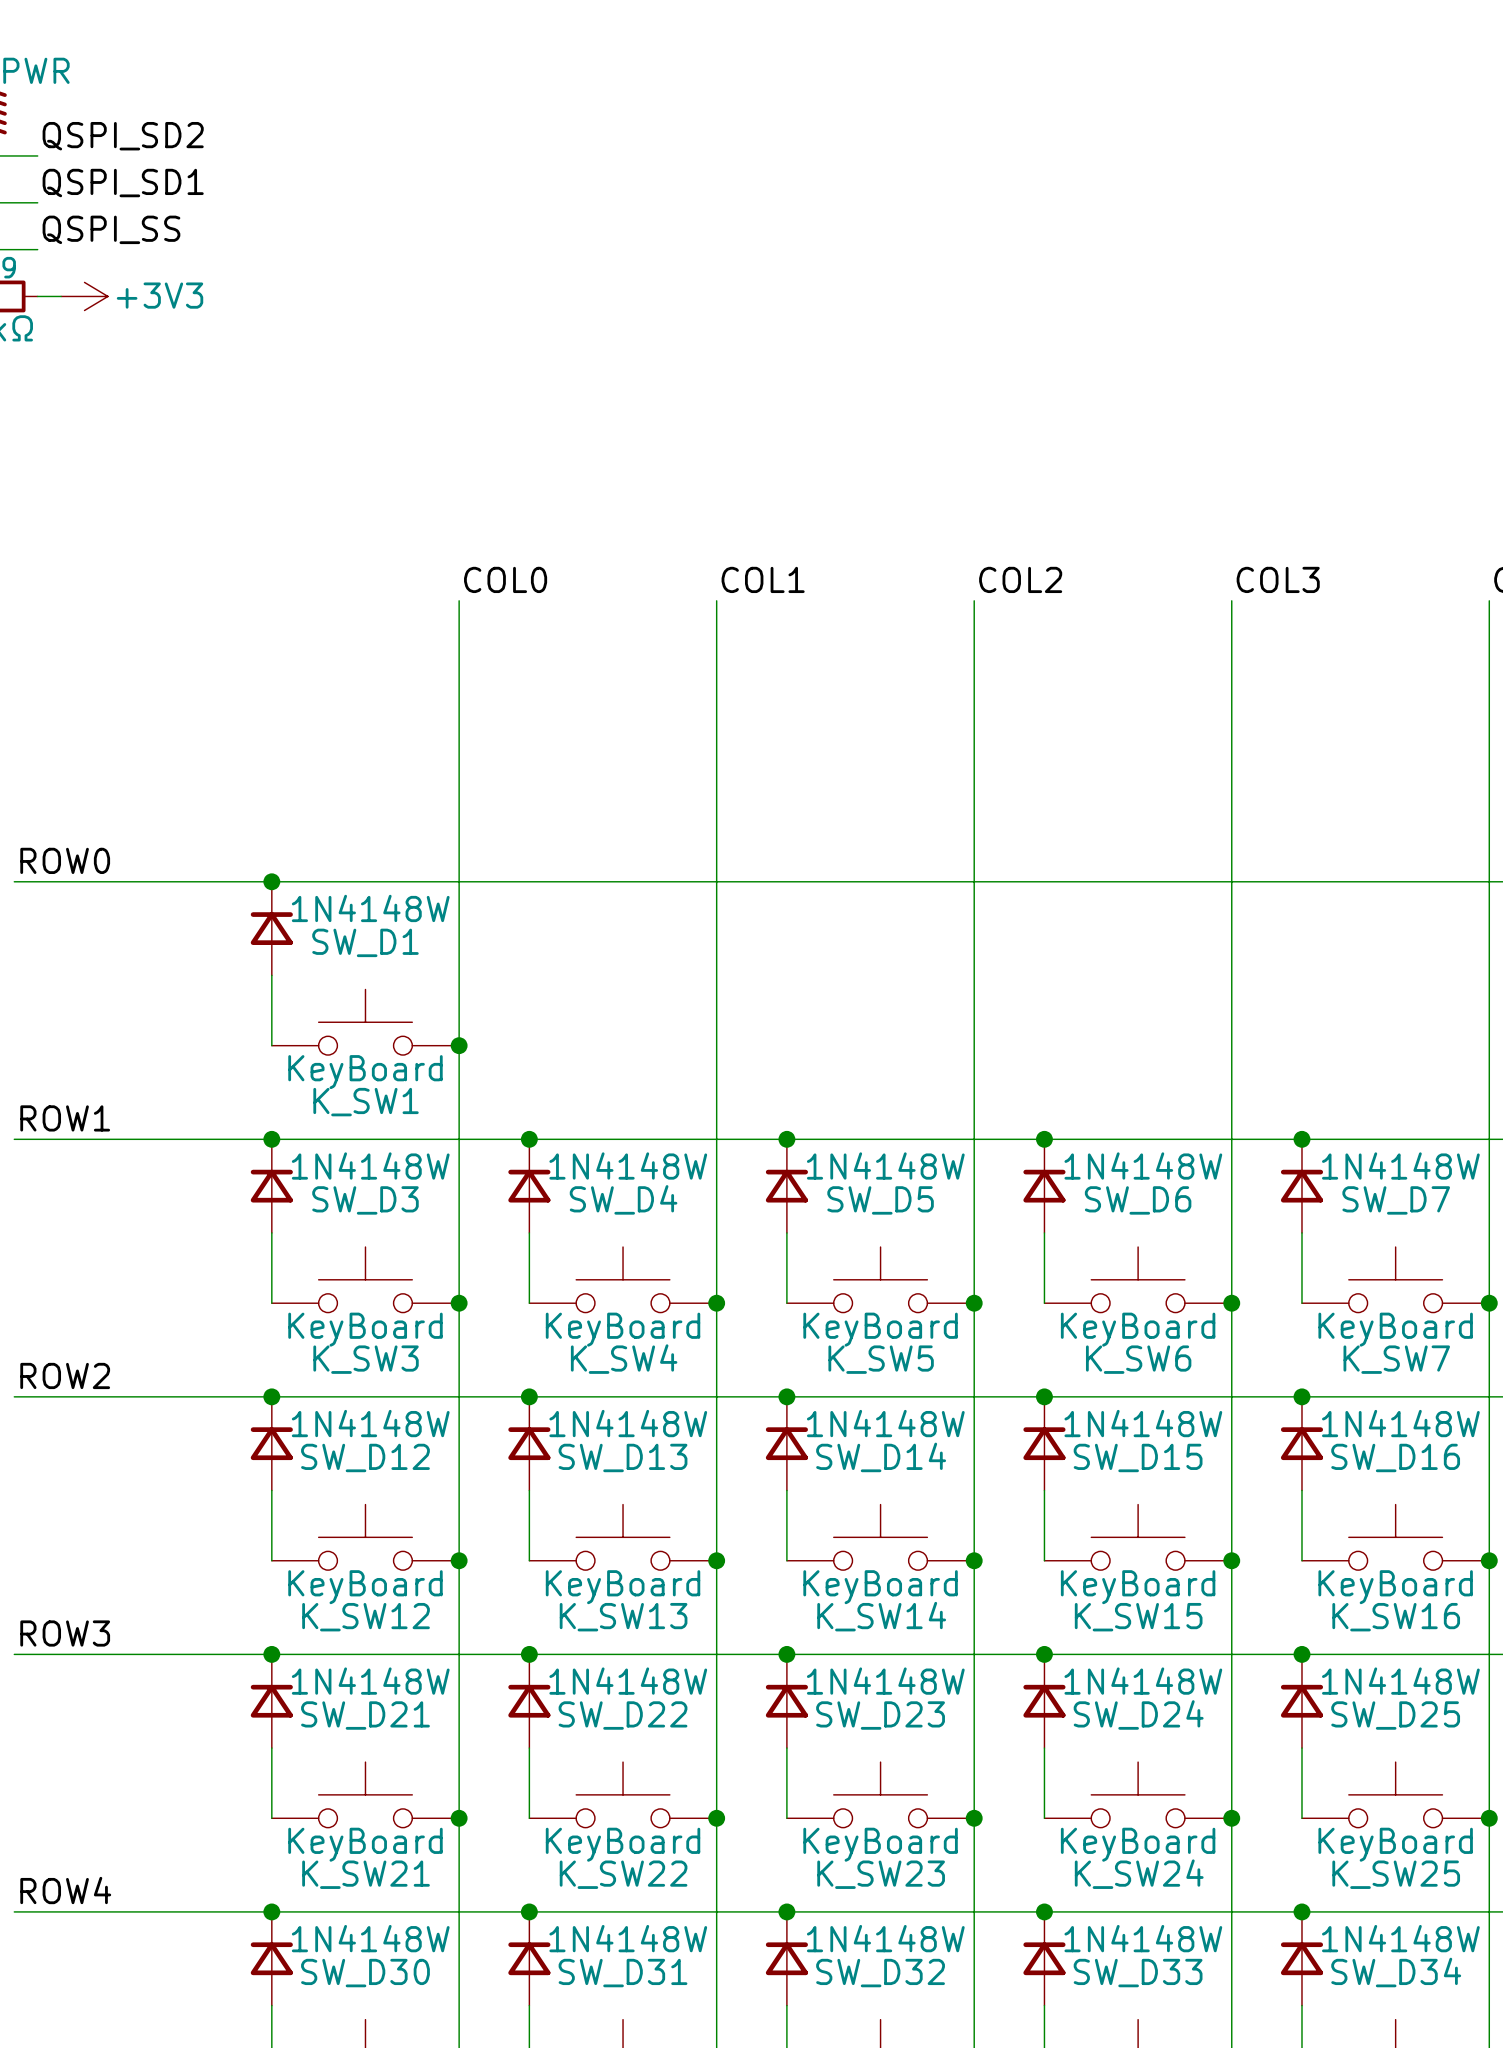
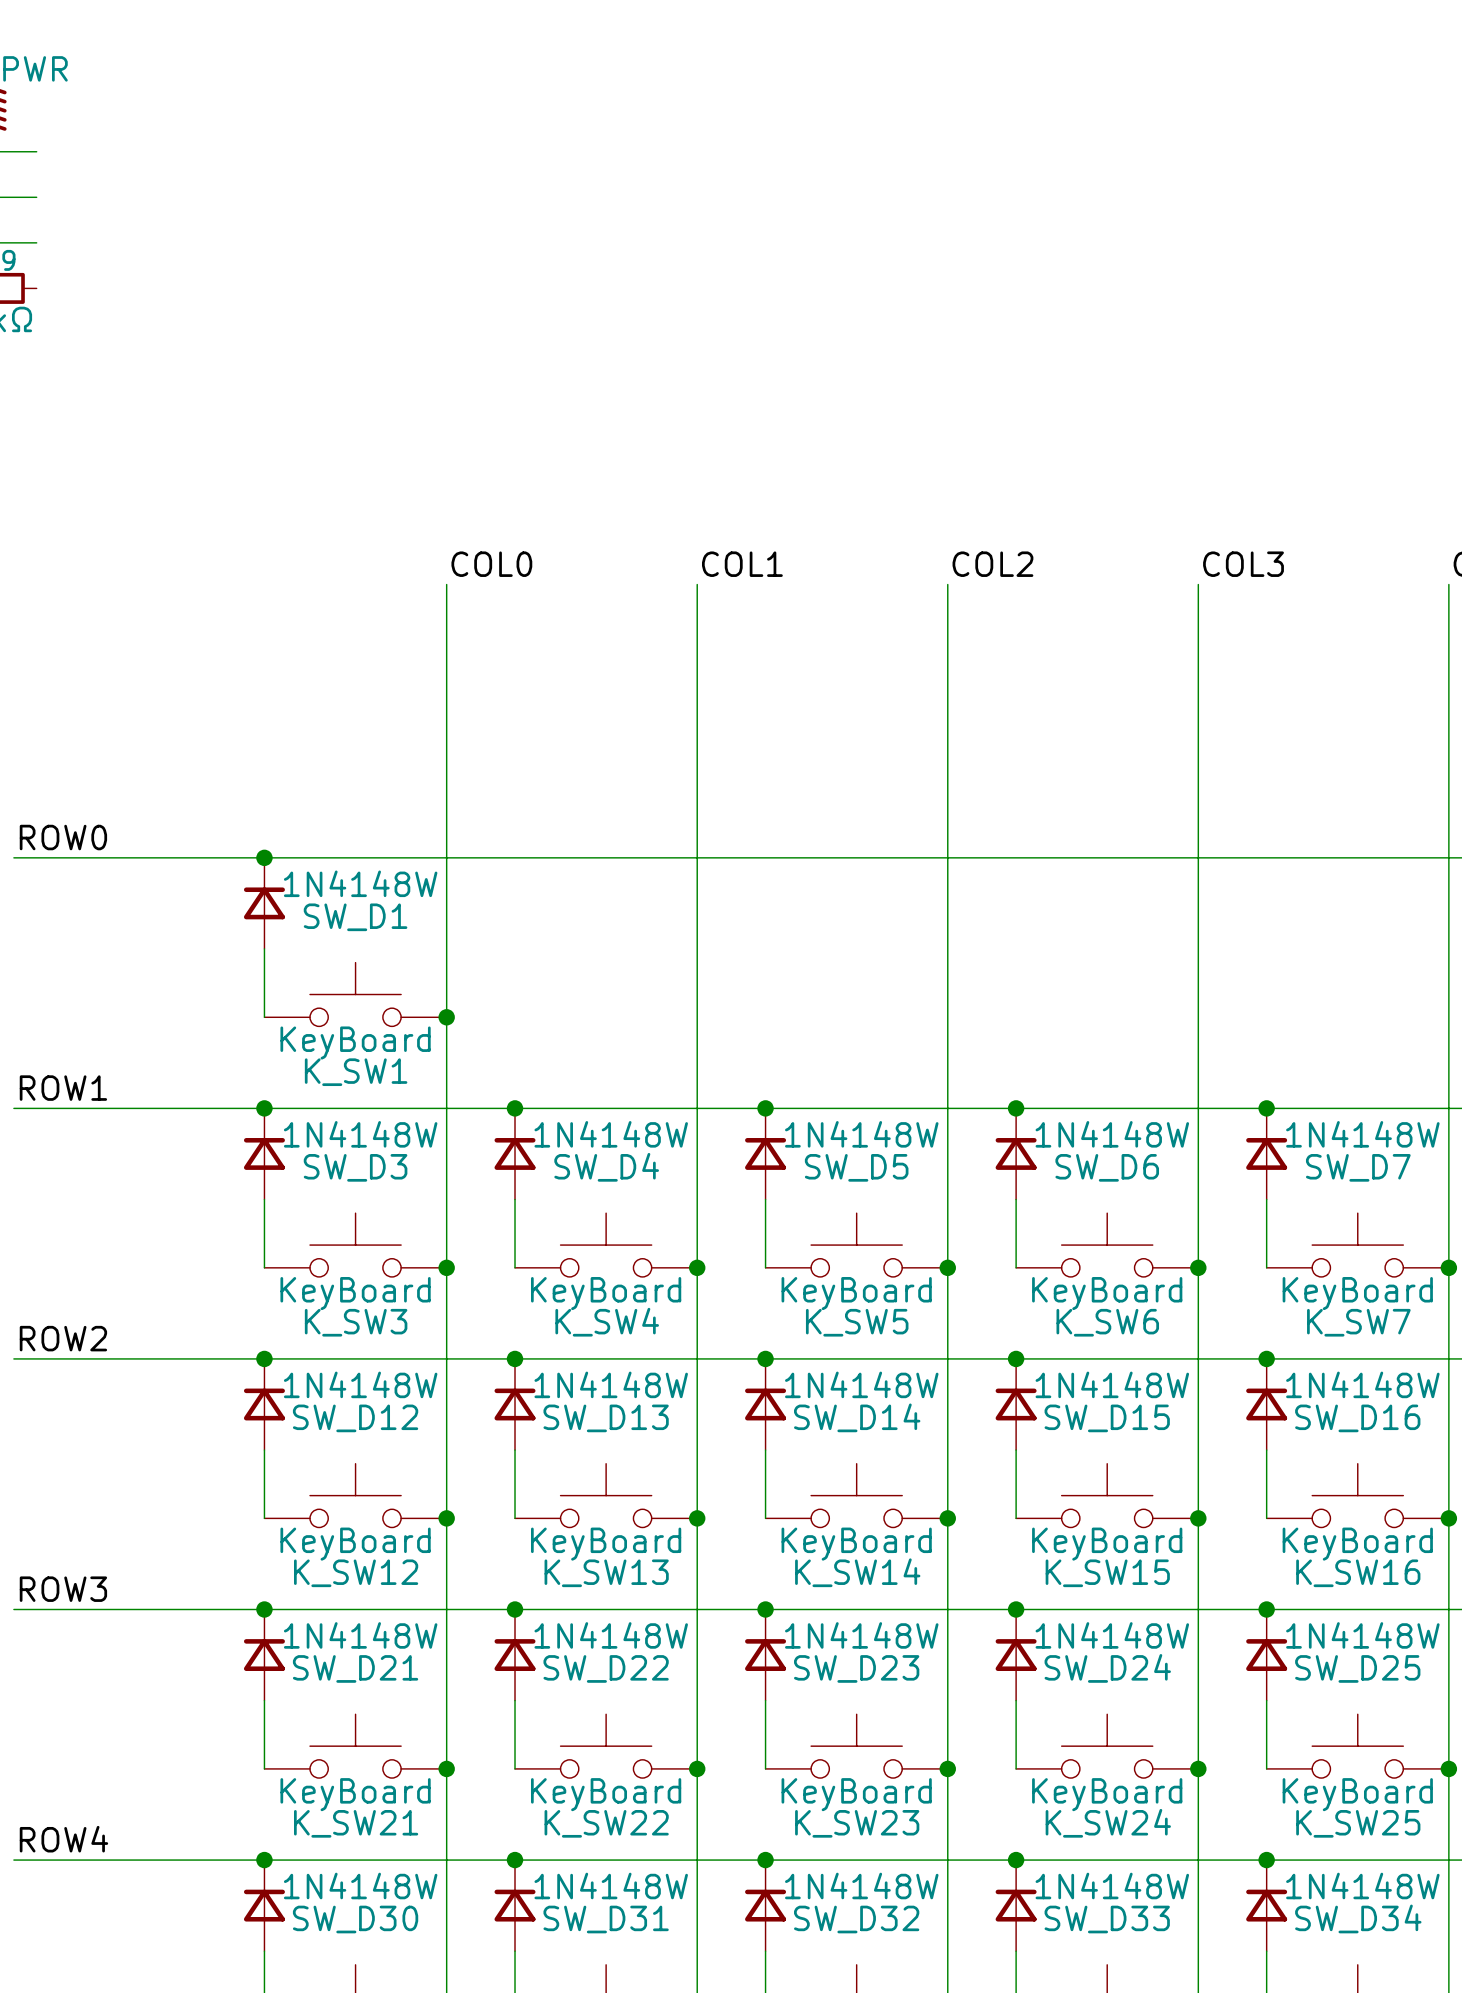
label: QSPI_SD2 (123, 136) -> none
label: QSPI_SD1 (123, 183) -> none
label: QSPI_SS (111, 229) -> none
wire: (37, 296) (61, 296) -> none
power symbol: +3V3 (84, 296) -> none

